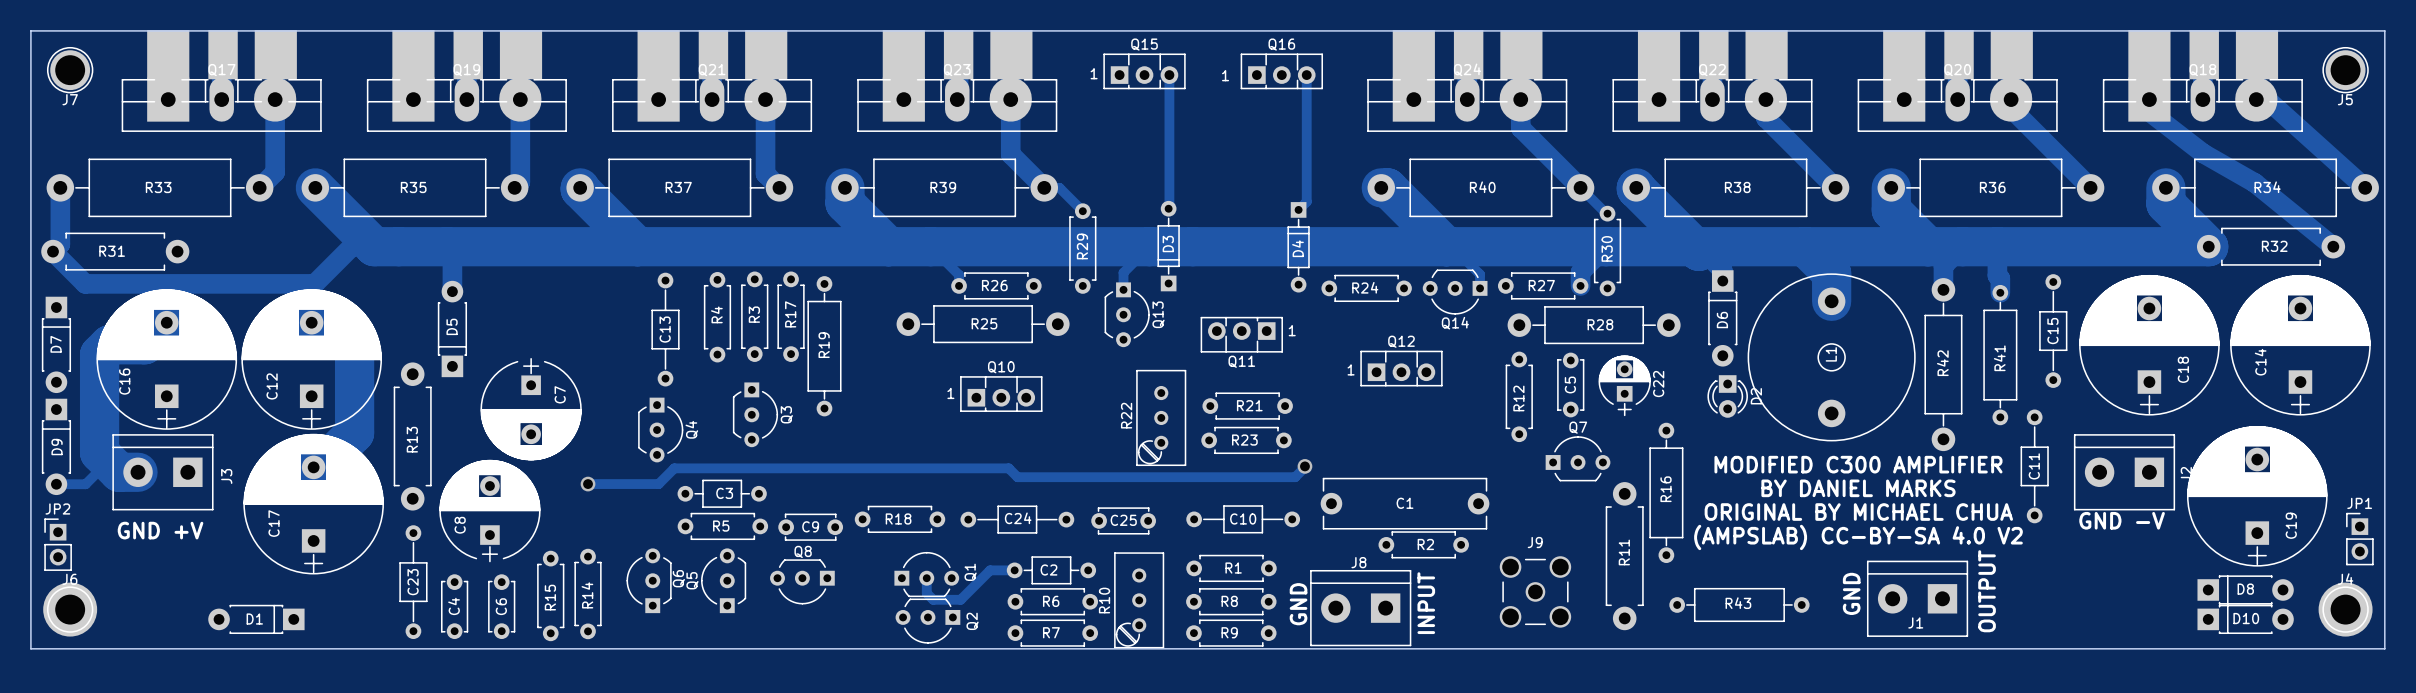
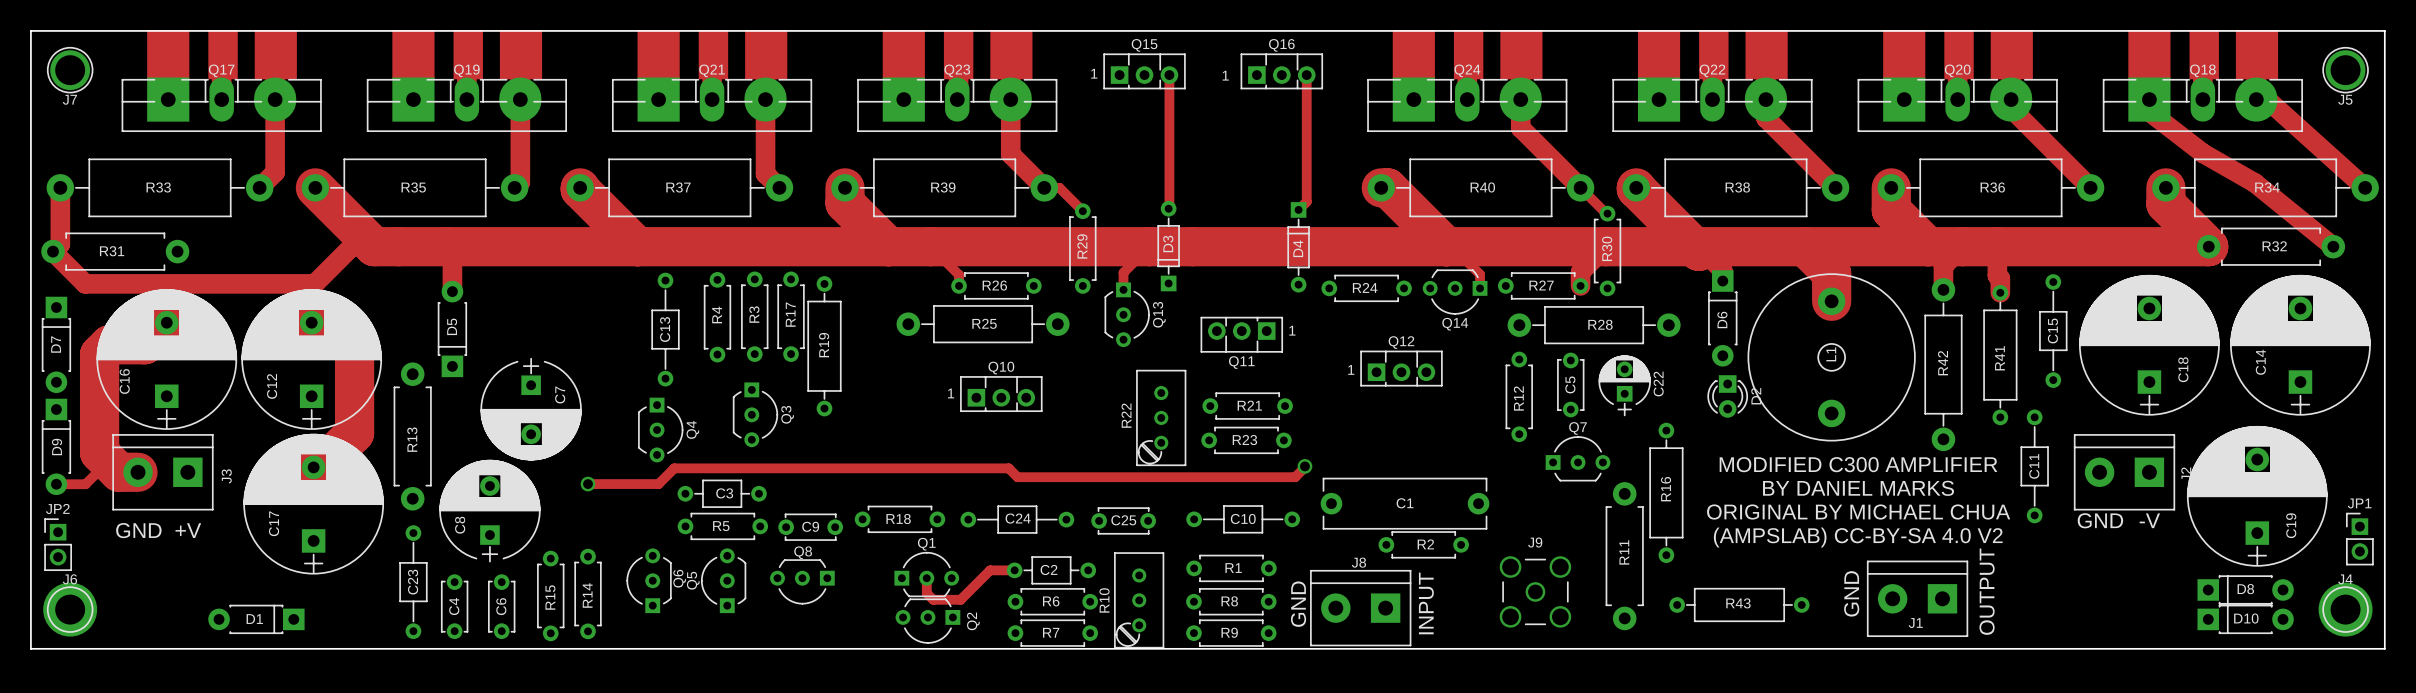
Q1 name rotation: 0° (970, 572) -> 90° clockwise (926, 544)
Q1 name position: Q1 (970, 572) -> Q1 (926, 544)

